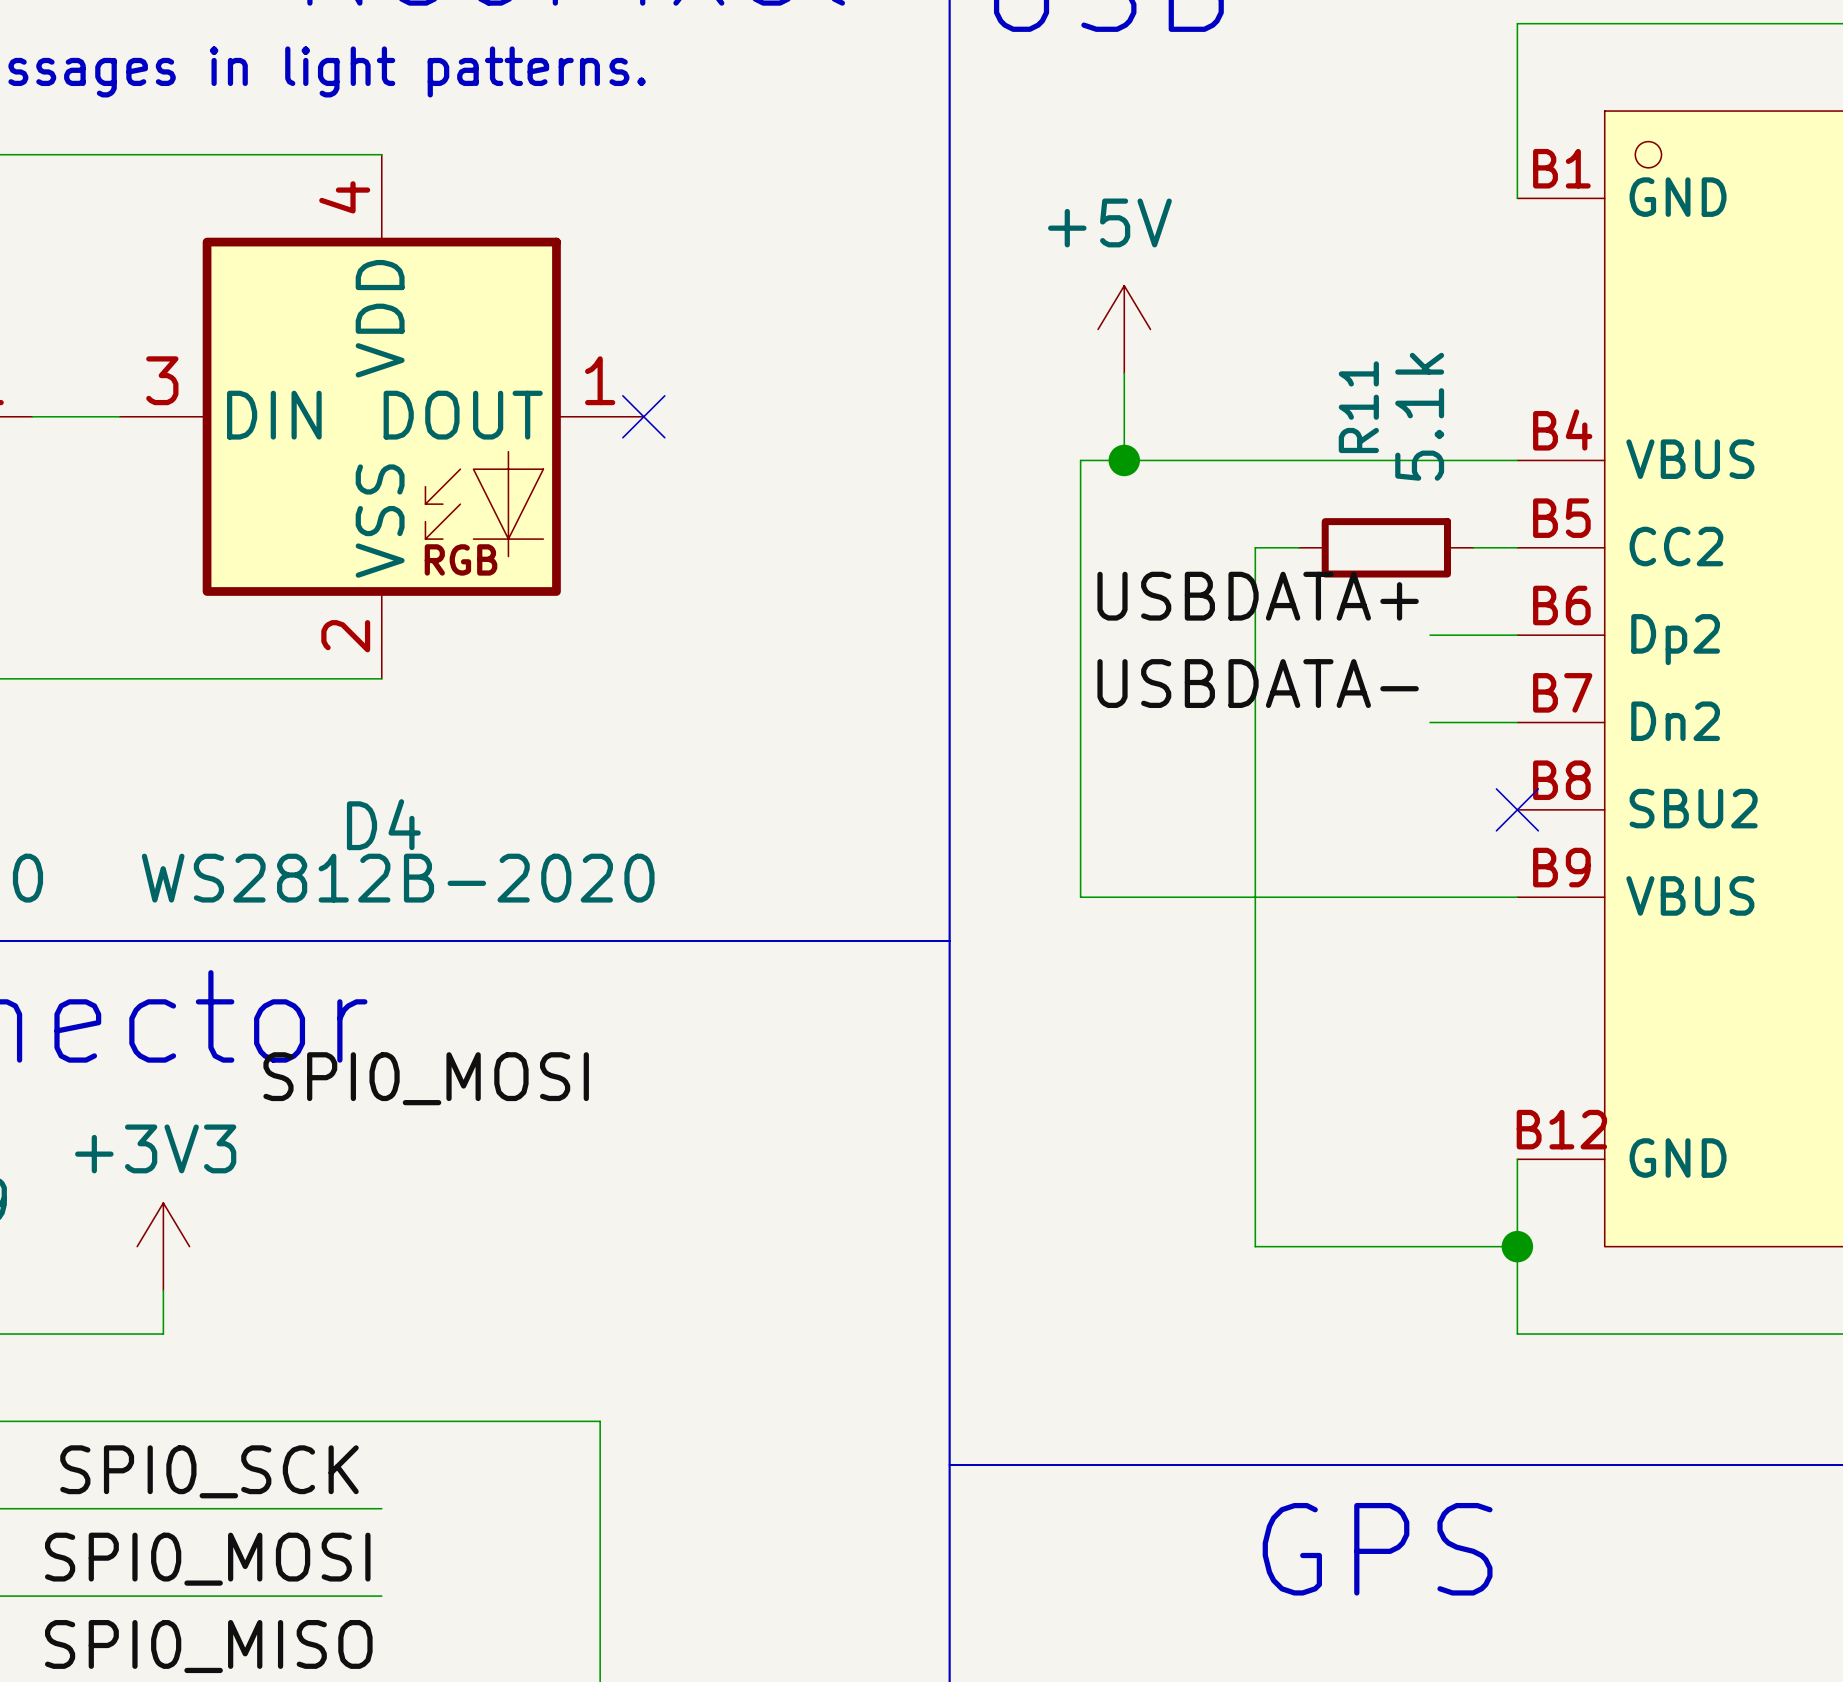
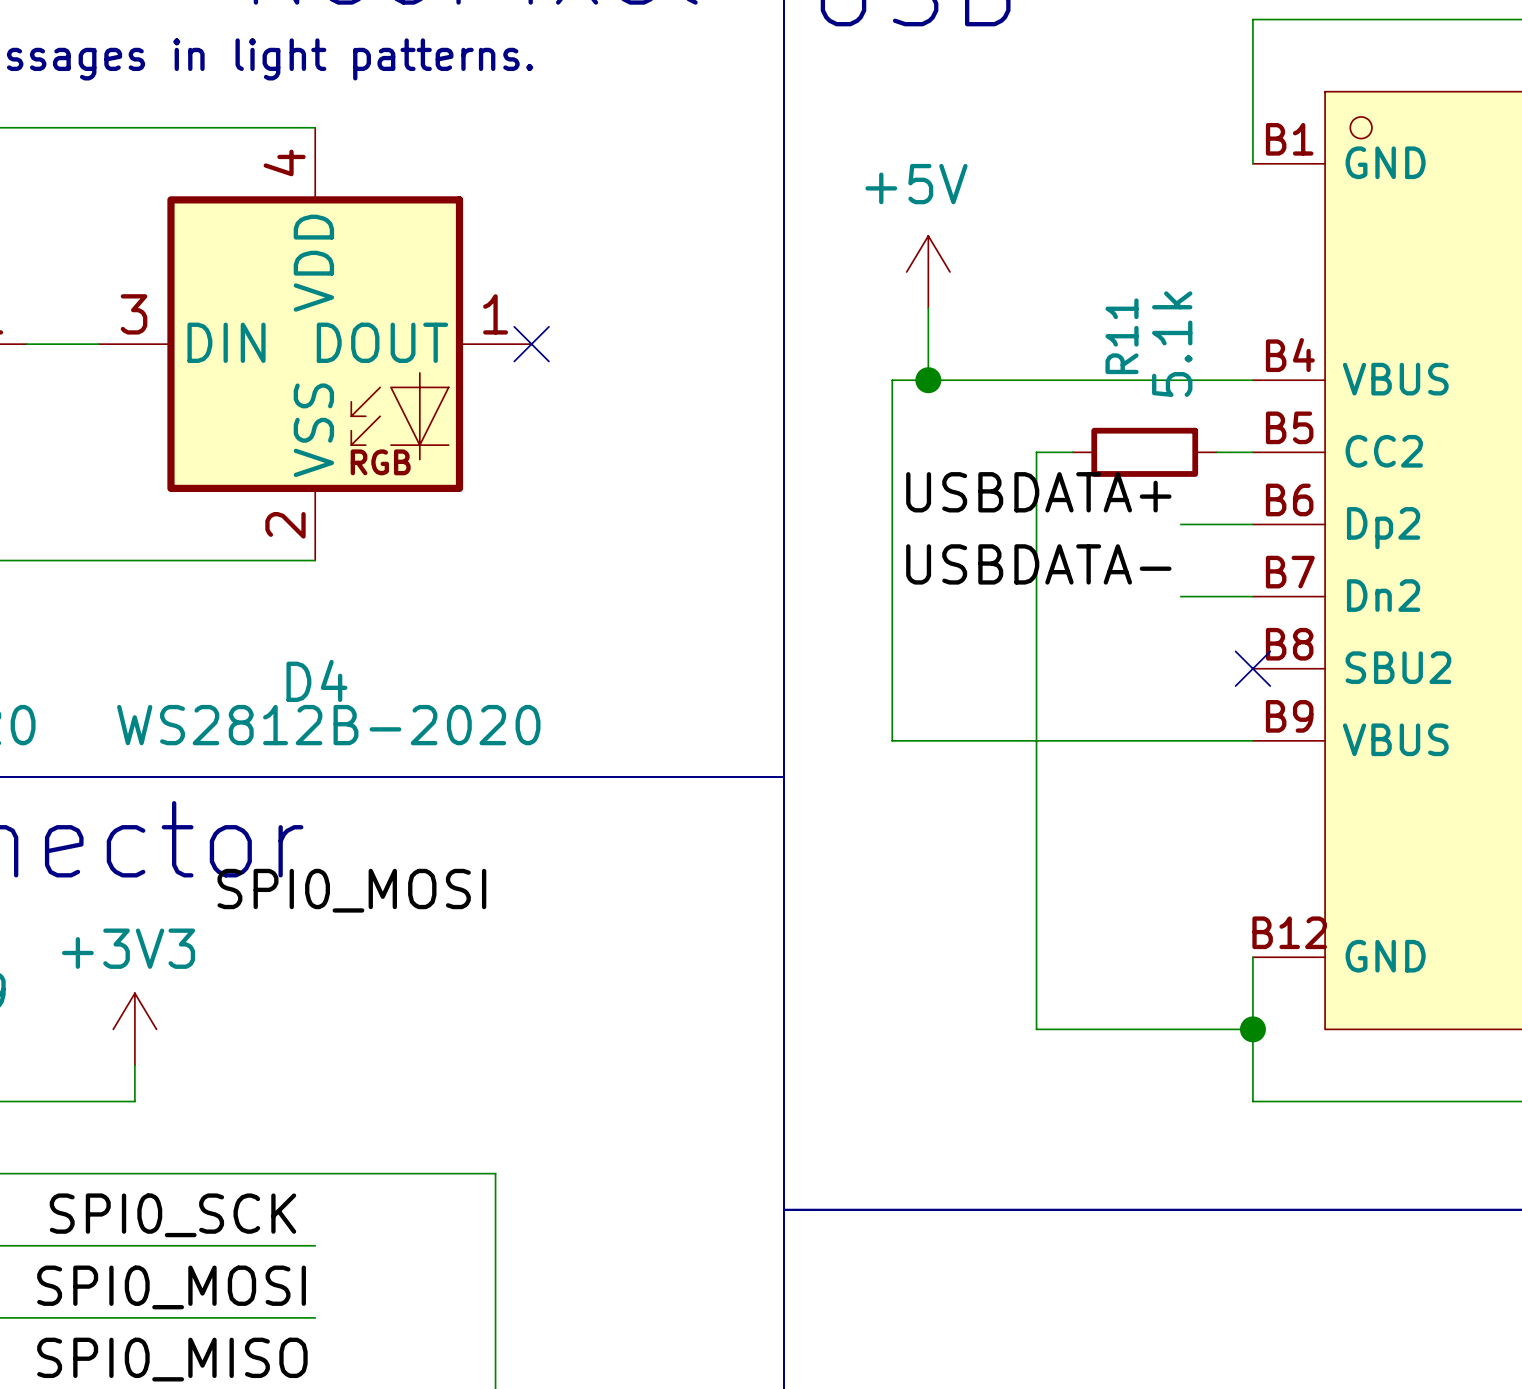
text: GPS (1377, 1549) -> none

